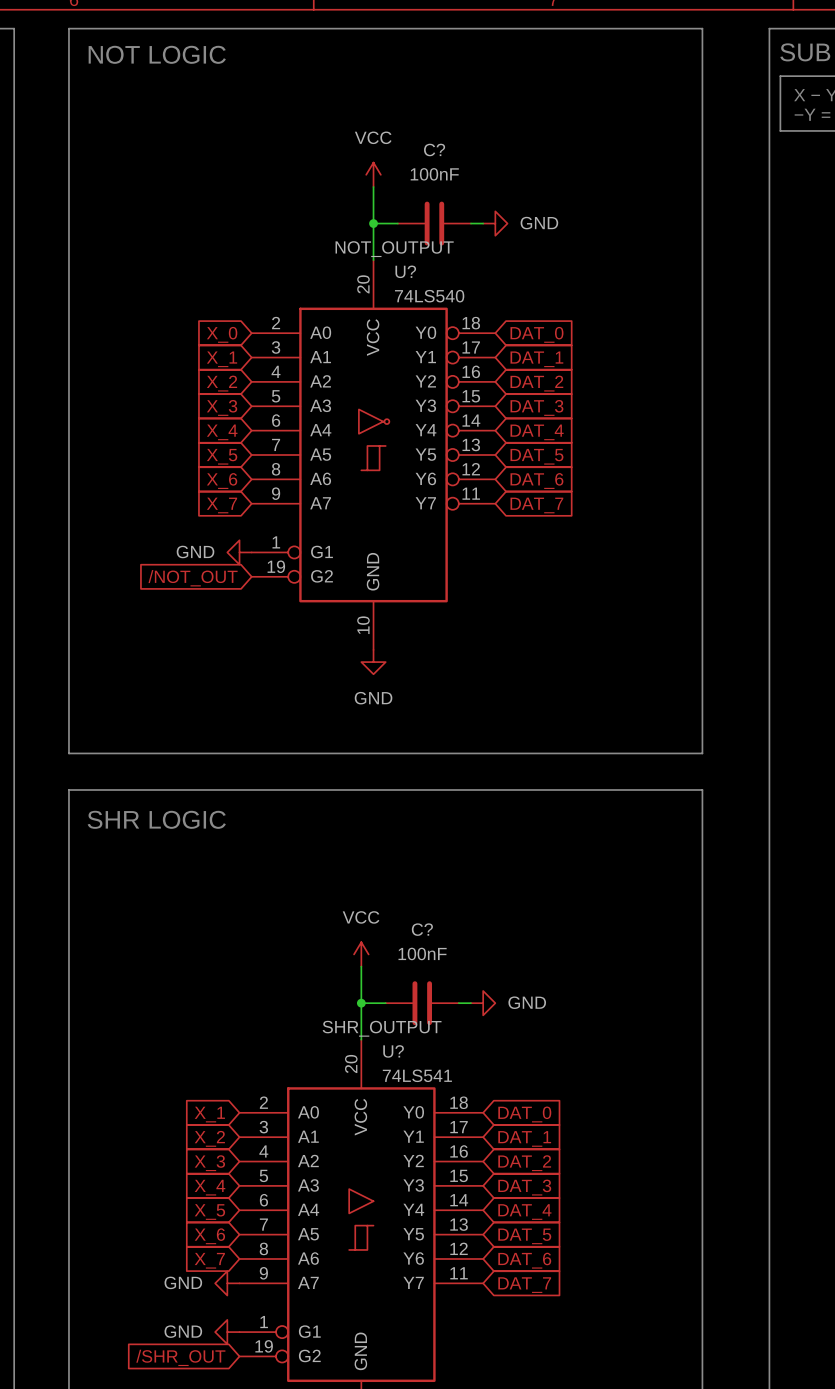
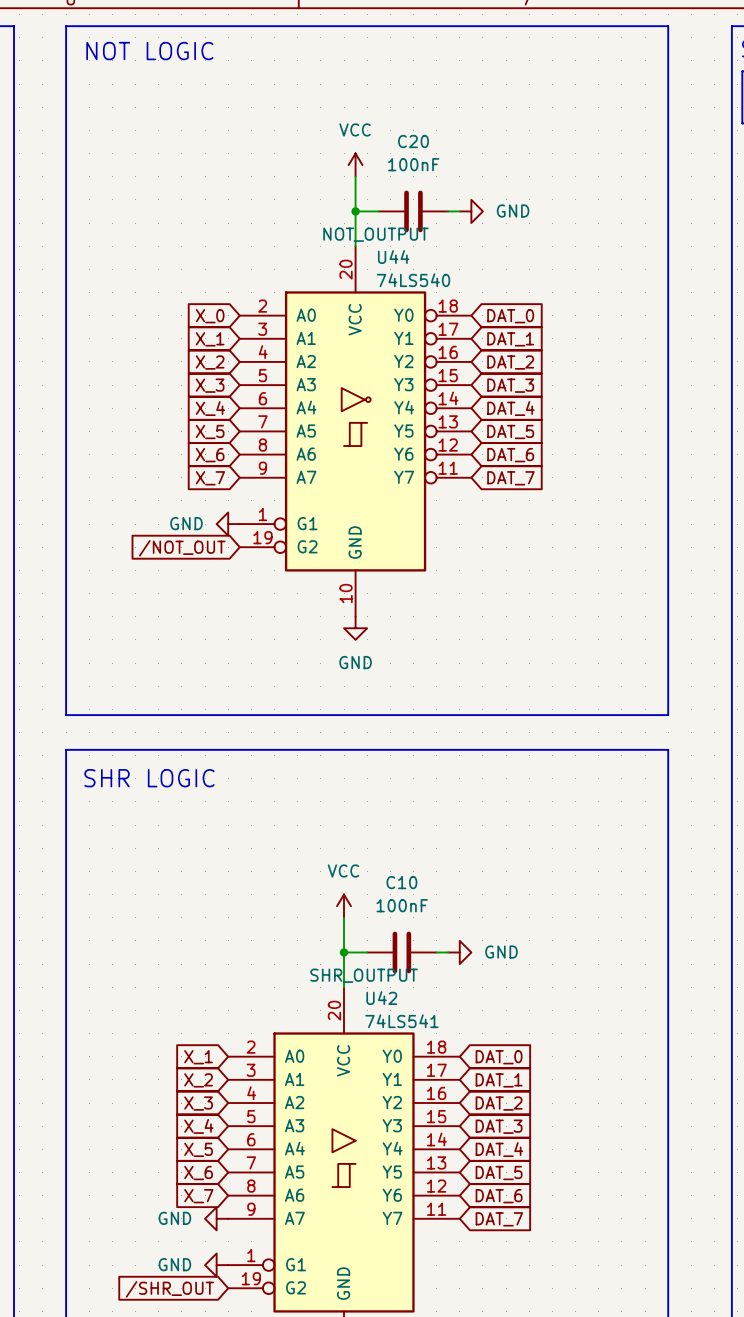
C? name: C? (434, 149) -> C20 (413, 141)
U? name: U? (405, 271) -> U44 (393, 257)
C? name: C? (422, 929) -> C10 (401, 882)
U? name: U? (393, 1051) -> U42 (381, 998)

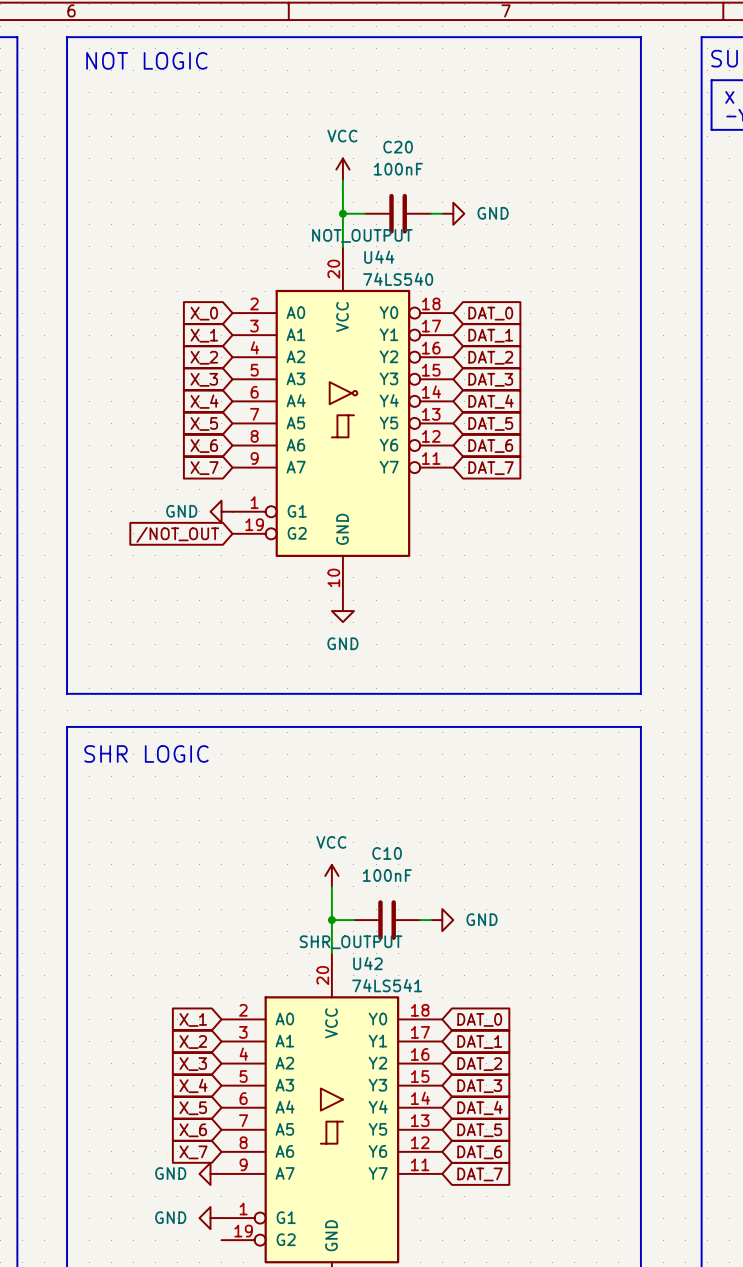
global label: /SHR_OUT (169, 1289) -> none

